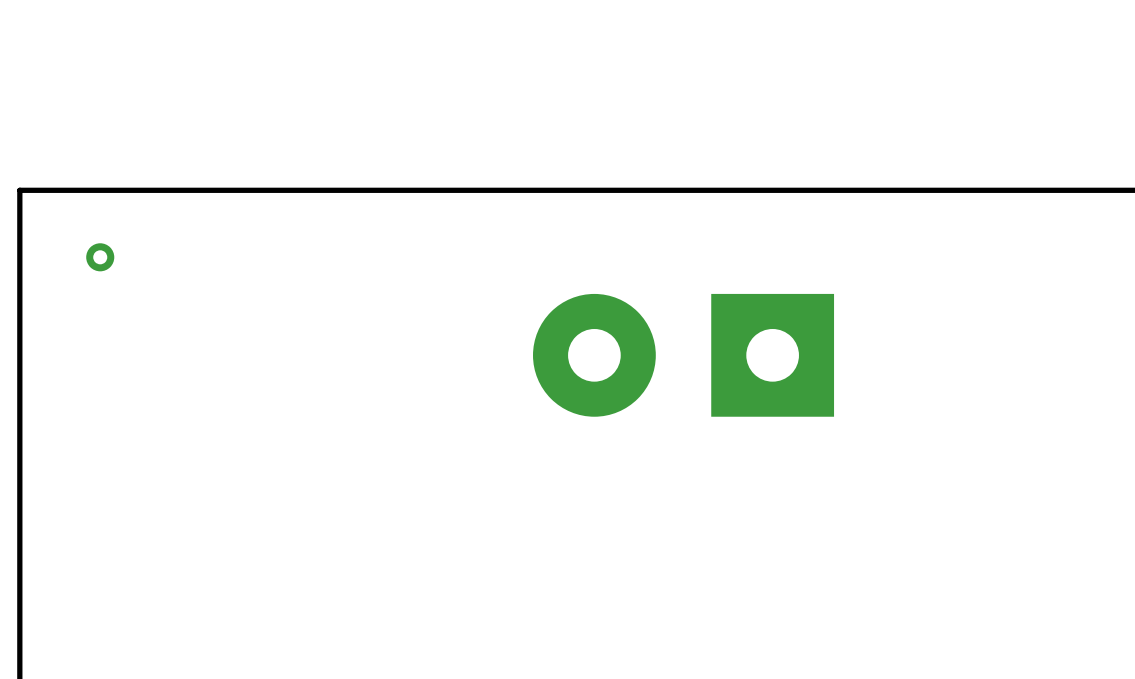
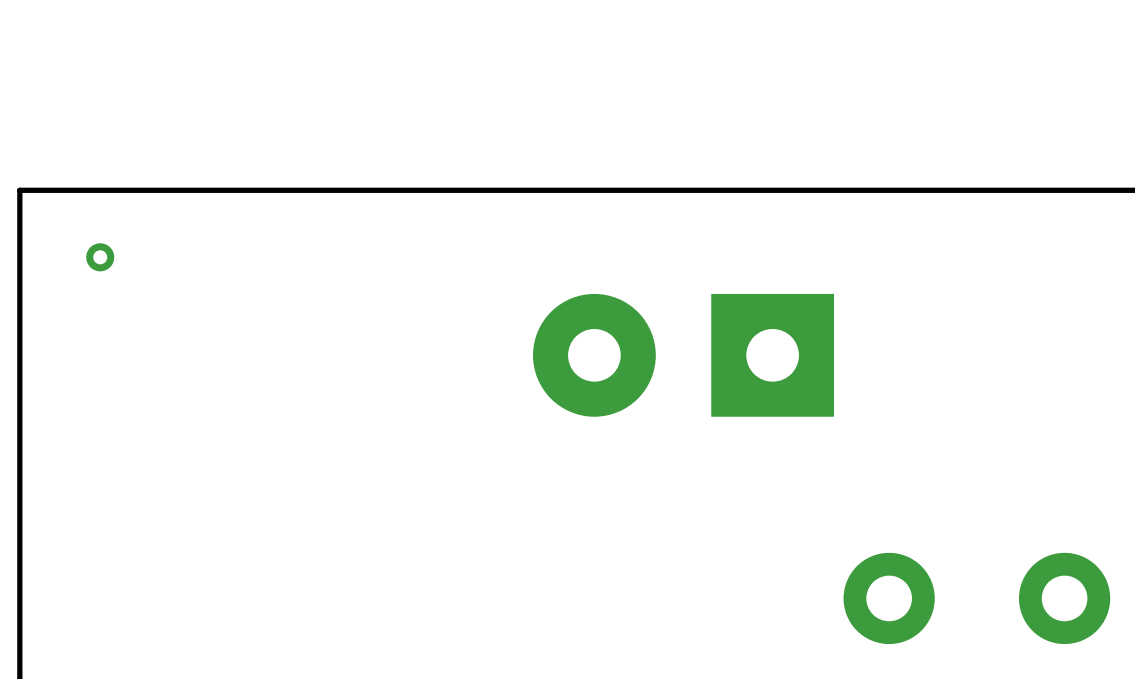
part: none -> (976, 598)

